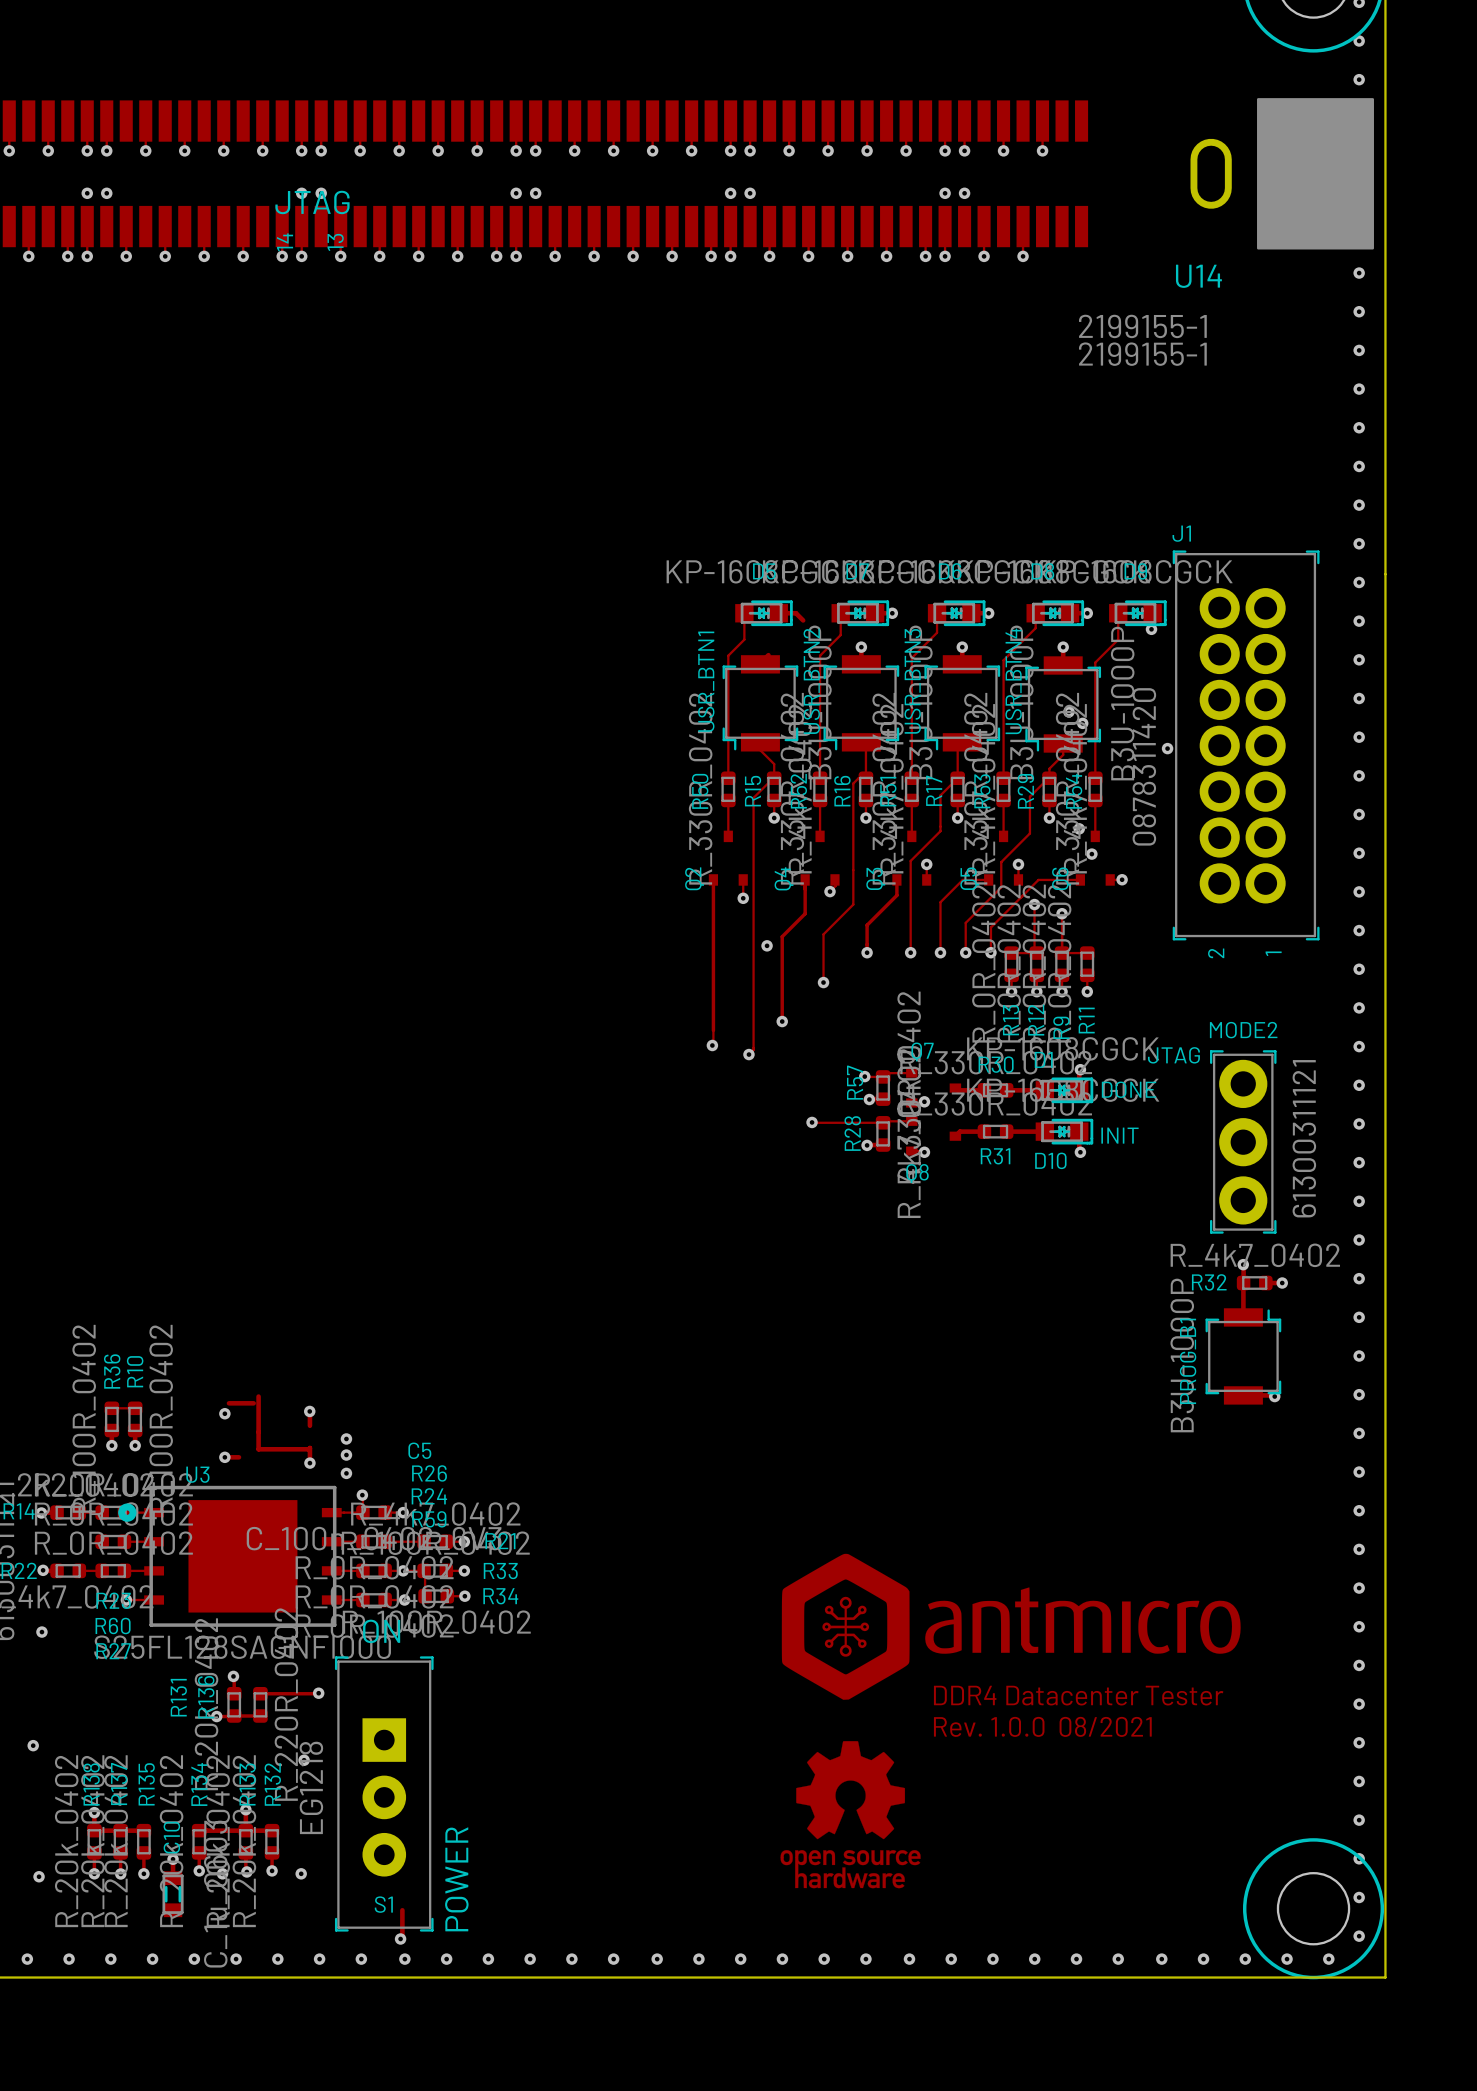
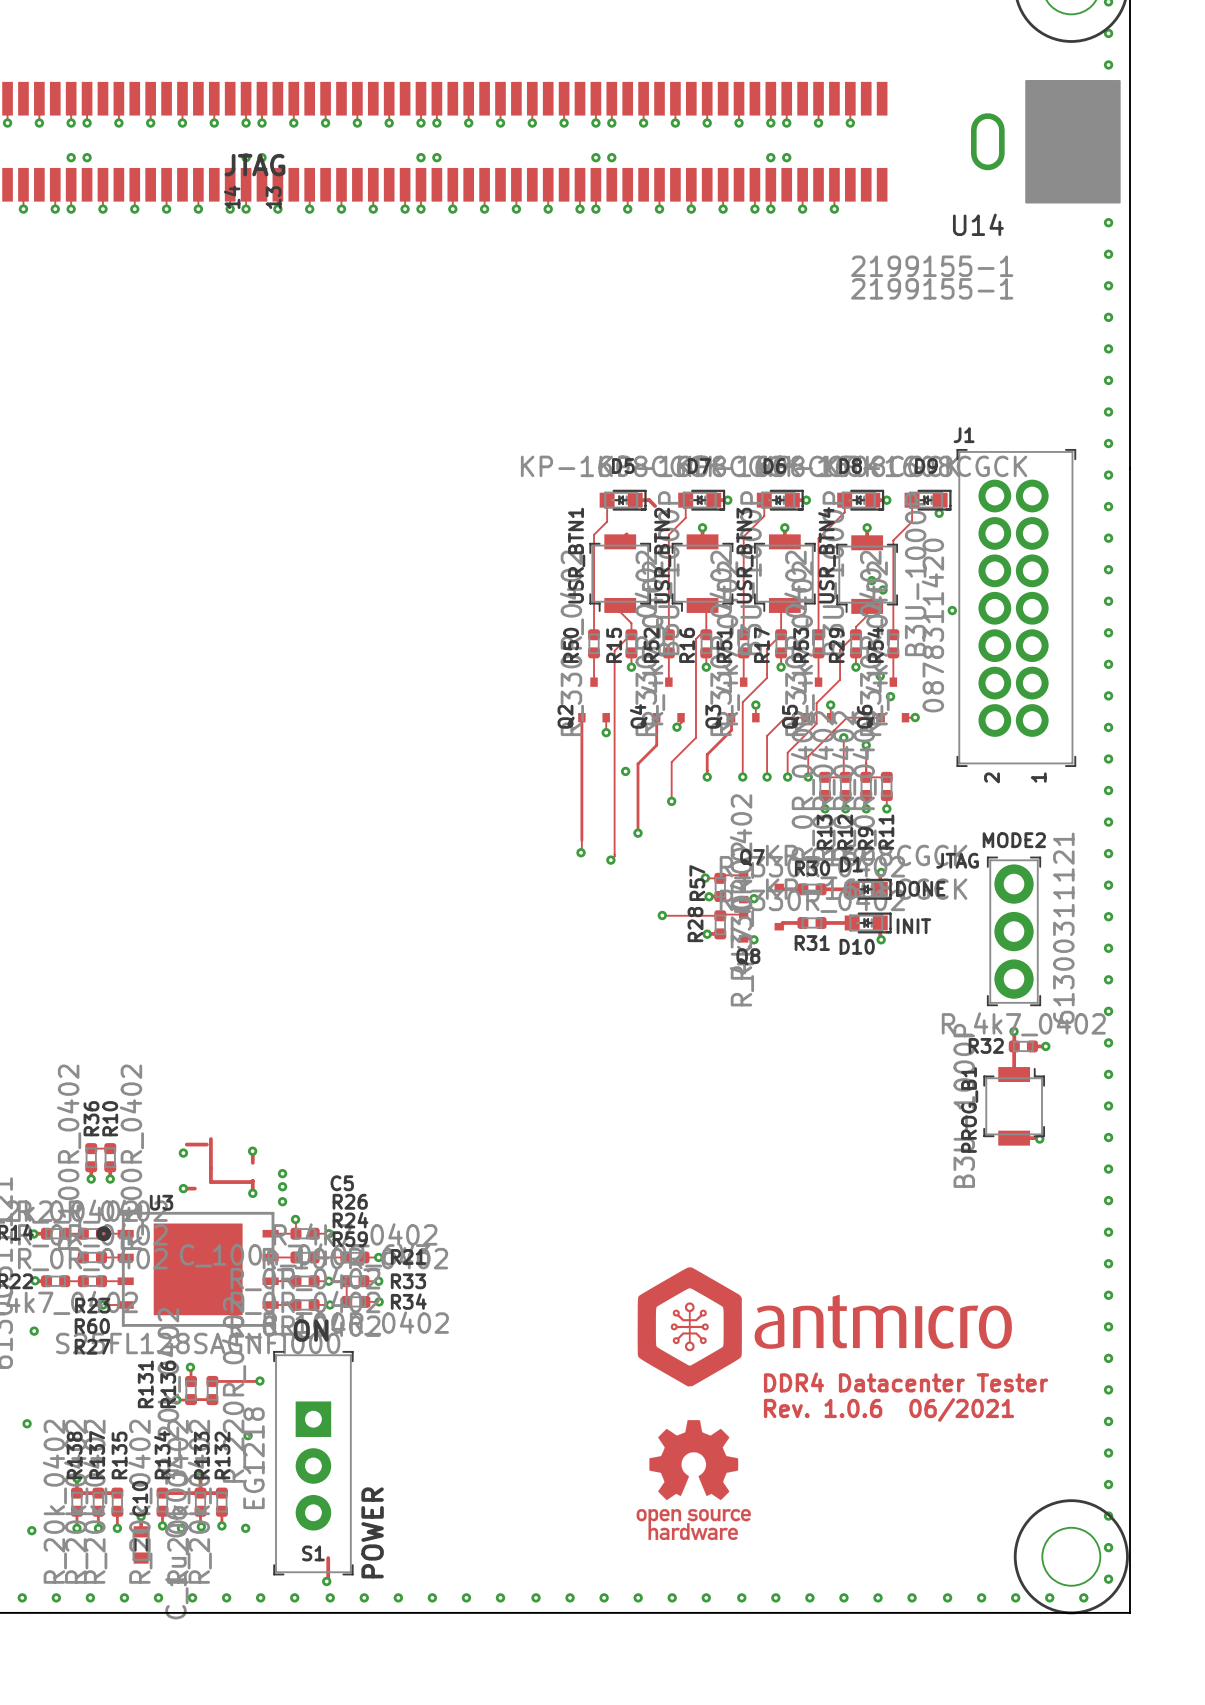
text: Rev. 1.0.0 08/2021 (1042, 1726) -> Rev. 1.0.6 06/2021 (889, 1409)

